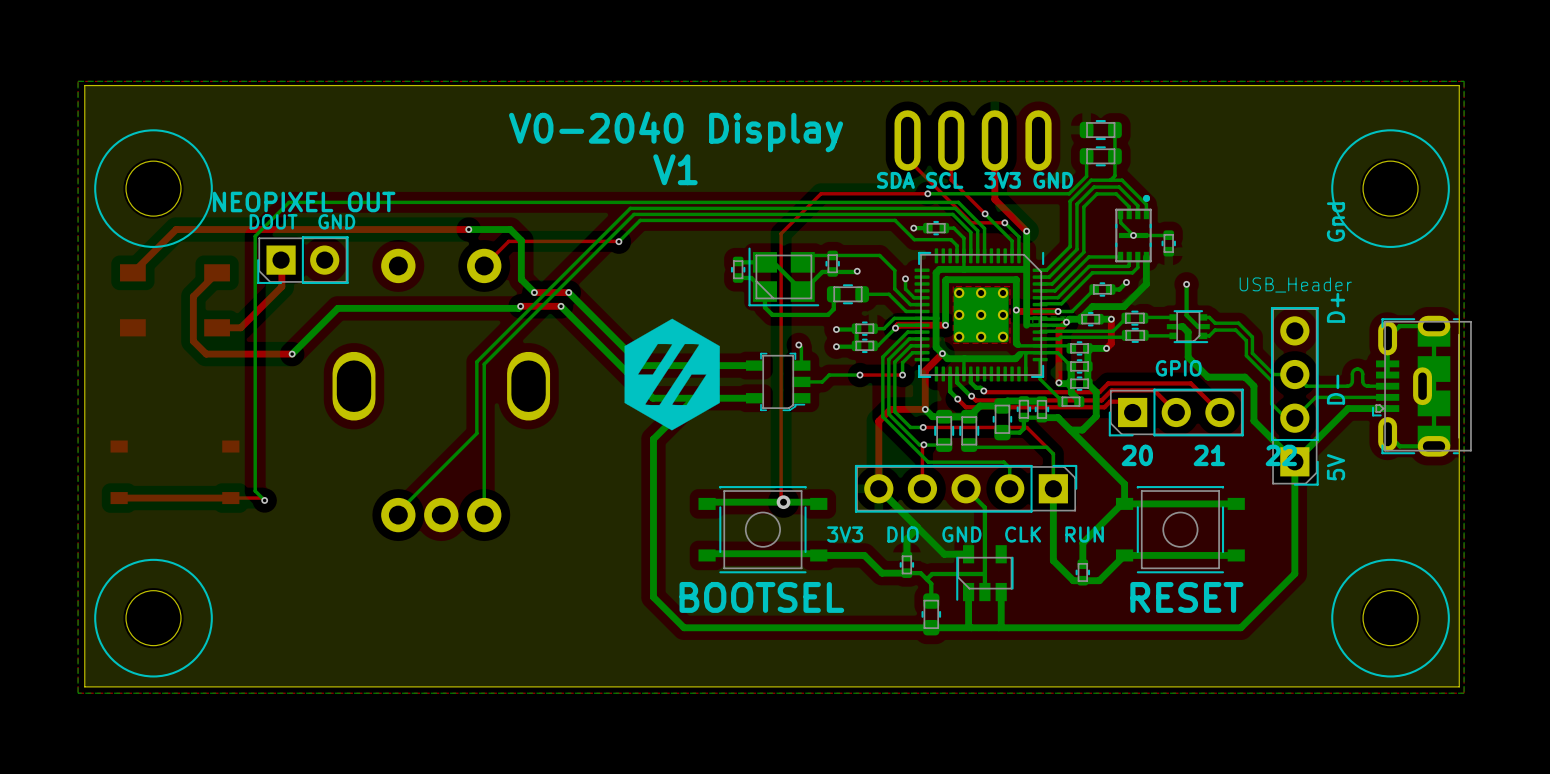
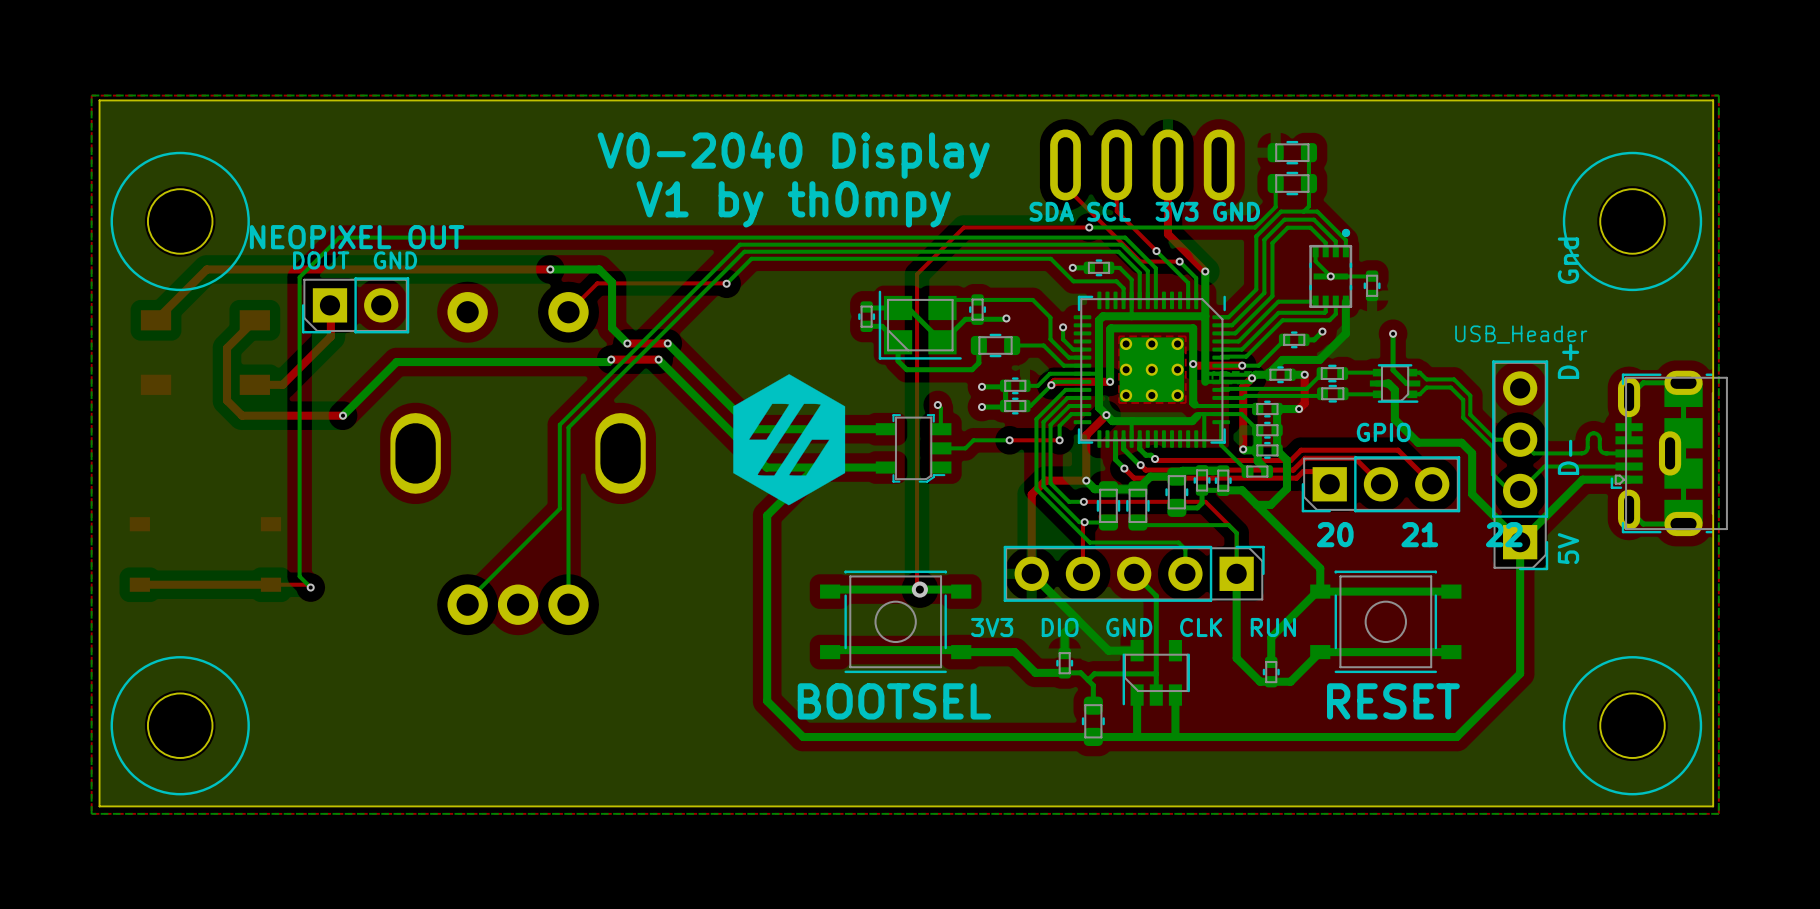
text: V1 (675, 169) -> V1 by th0mpy (793, 204)

